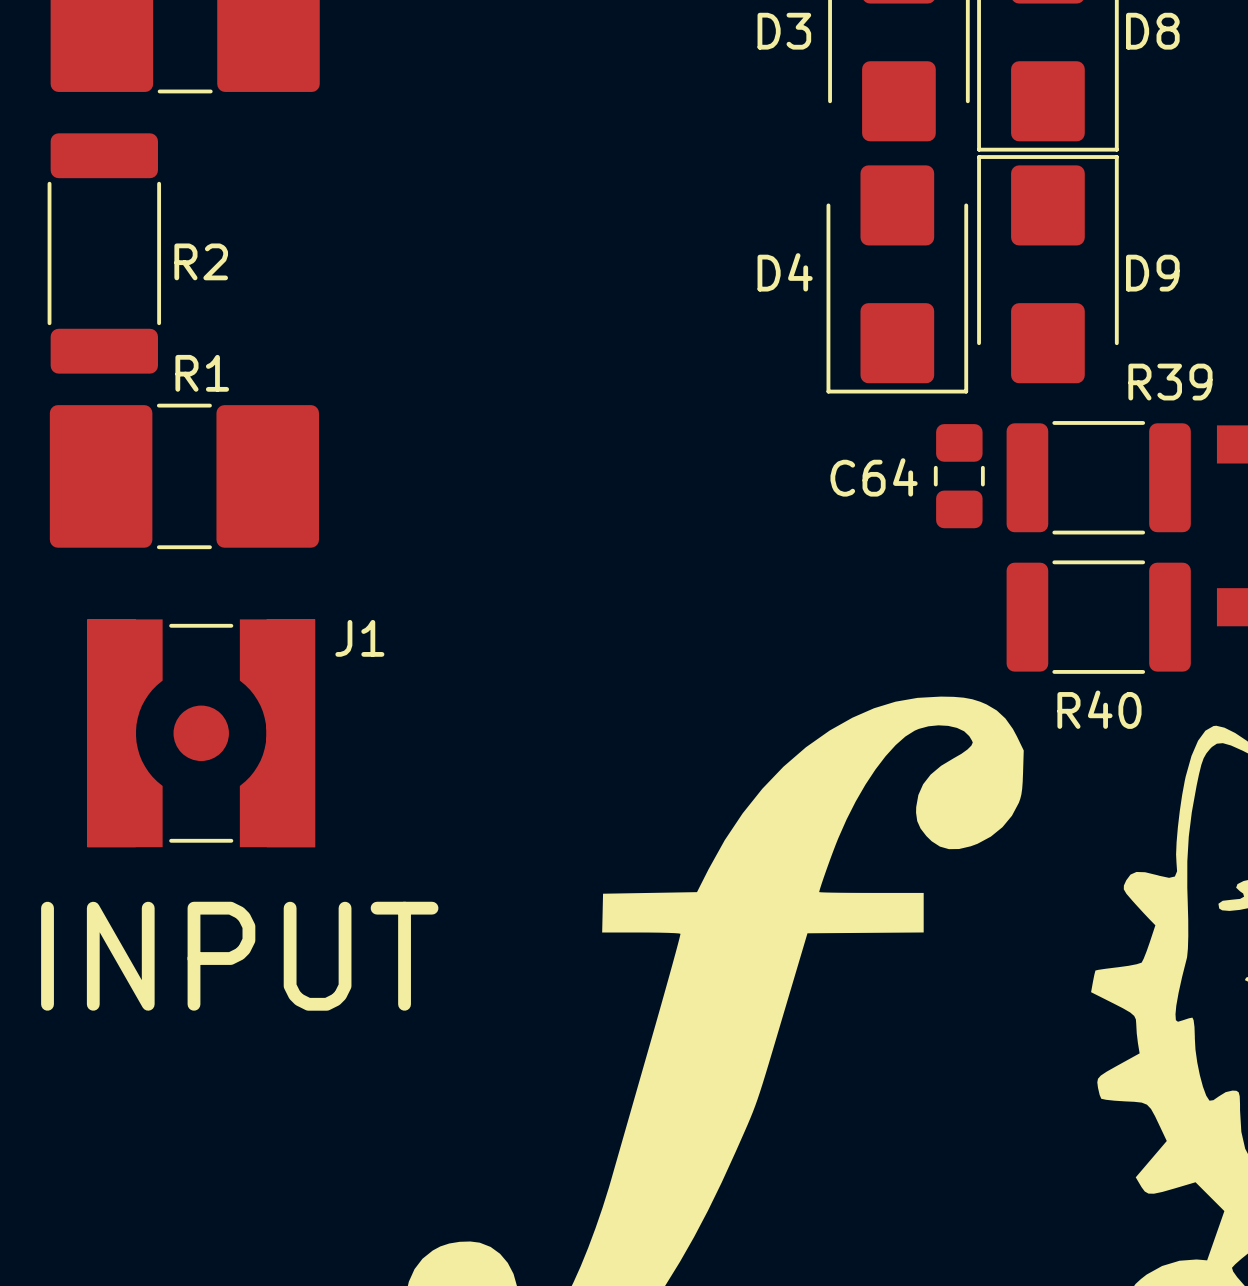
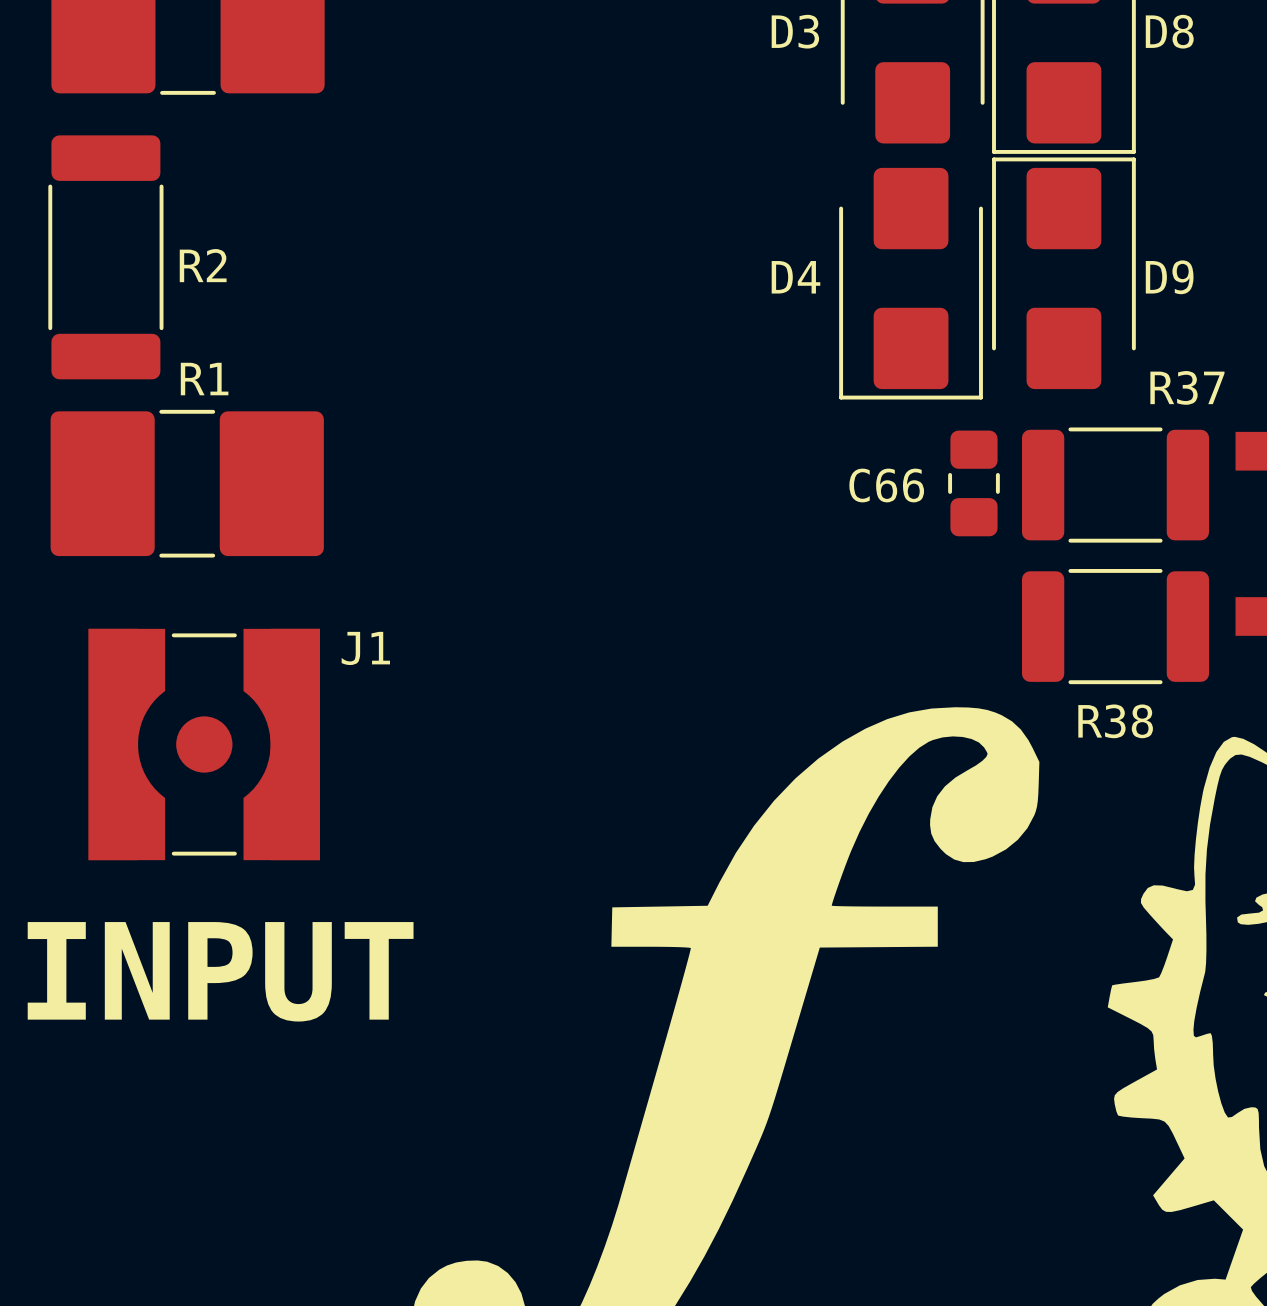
R39 name: R39 (1170, 382) -> R37 (1187, 387)
C64 name: C64 (874, 477) -> C66 (886, 485)
R40 name: R40 (1099, 709) -> R38 (1115, 721)

